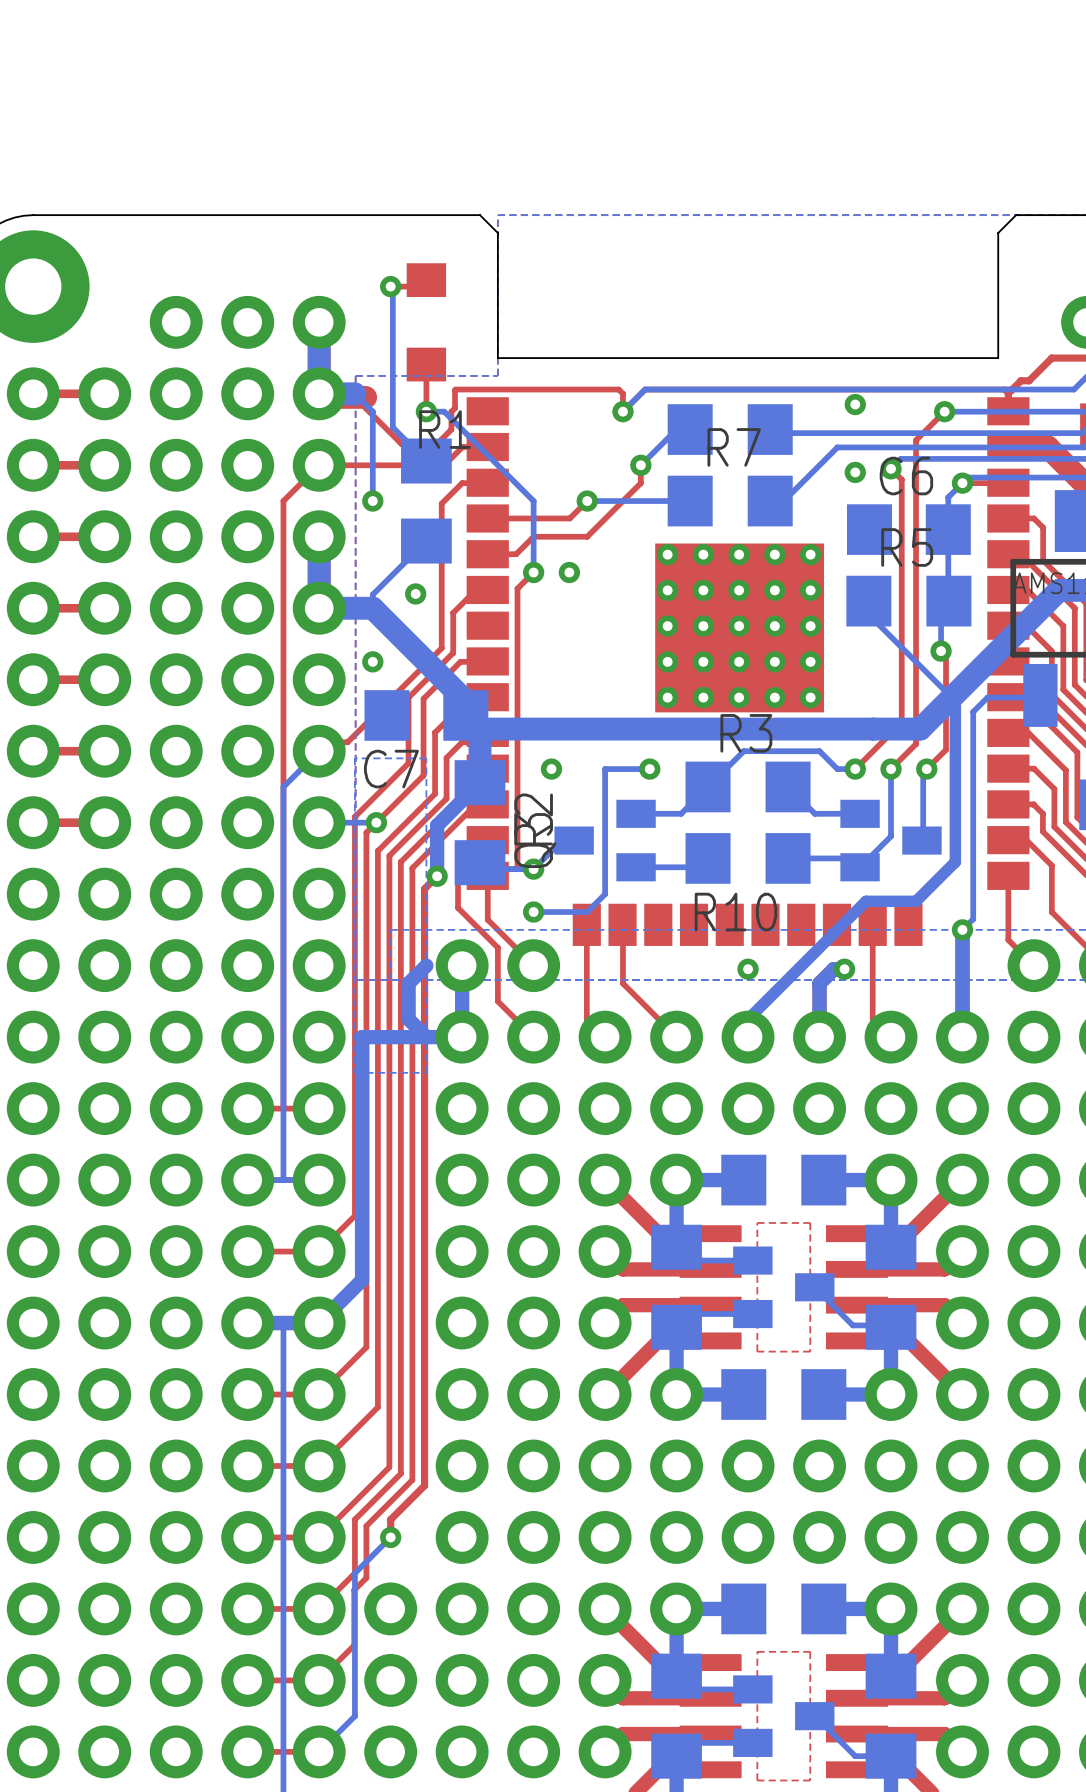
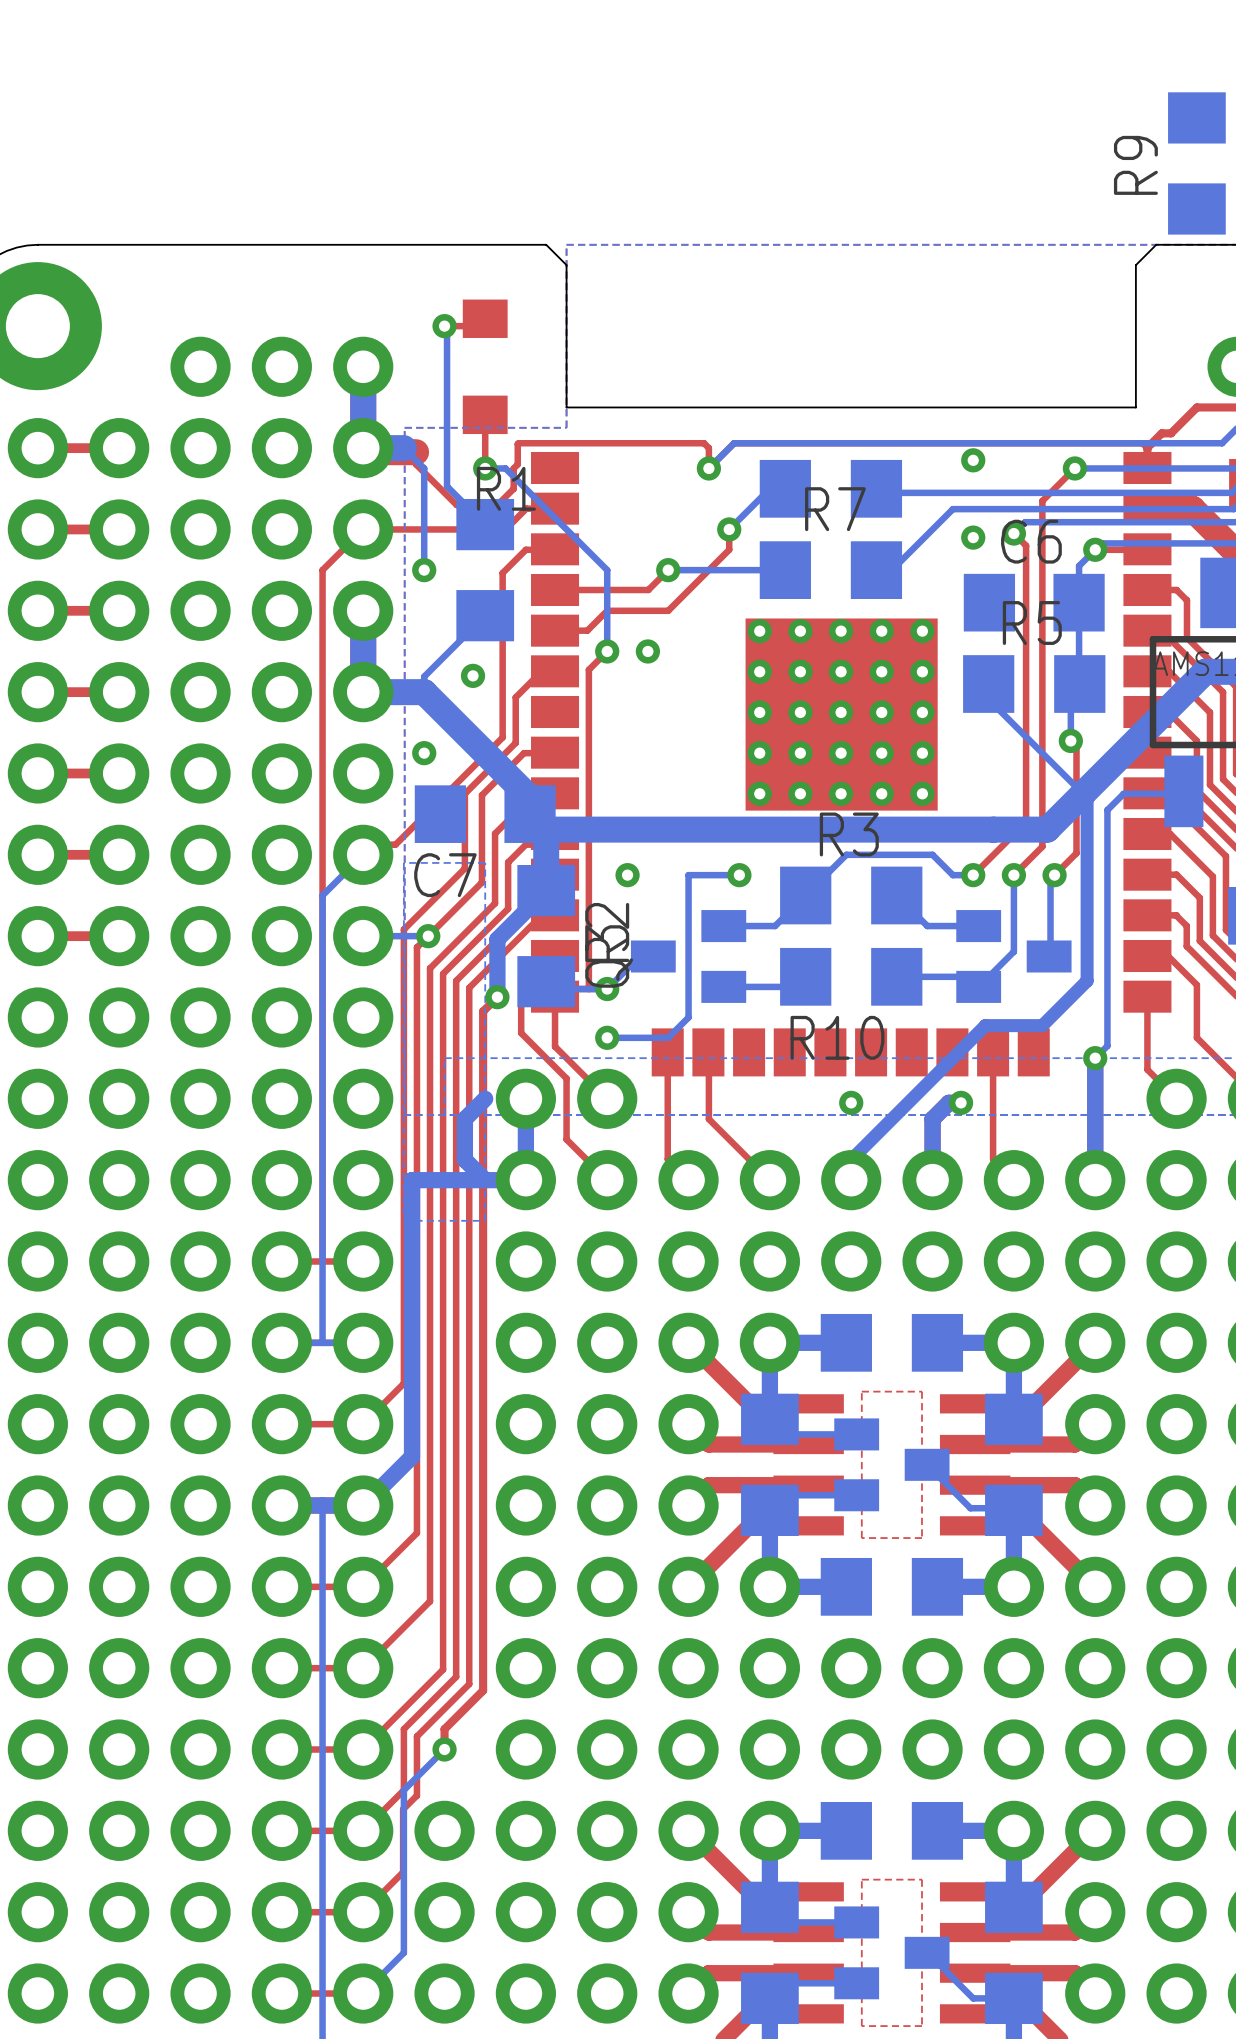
R9: none -> (1196, 163)

